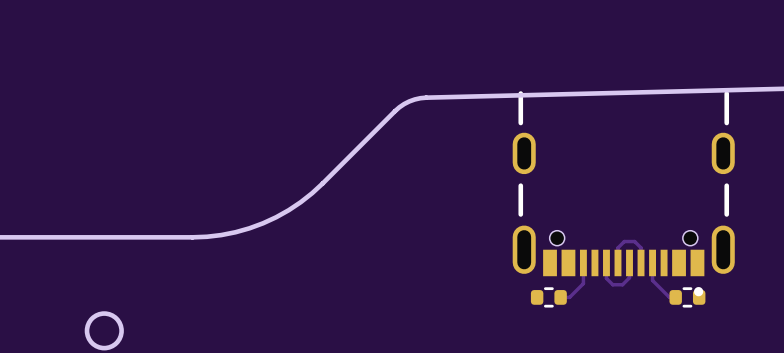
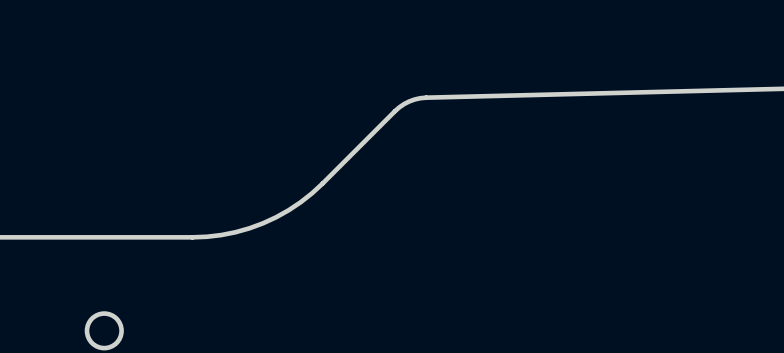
part: (623, 193) -> none
track: (583, 262) (583, 283) (569, 297) (560, 297) -> none
track: (606, 262) (606, 278) (612, 284) (622, 284) (629, 277) (629, 262) -> none
track: (617, 262) (617, 247) (624, 241) (634, 241) (641, 247) (641, 262) -> none
track: (652, 262) (652, 280) (669, 297) (675, 297) -> none
part: (548, 297) -> none
part: (687, 297) -> none

